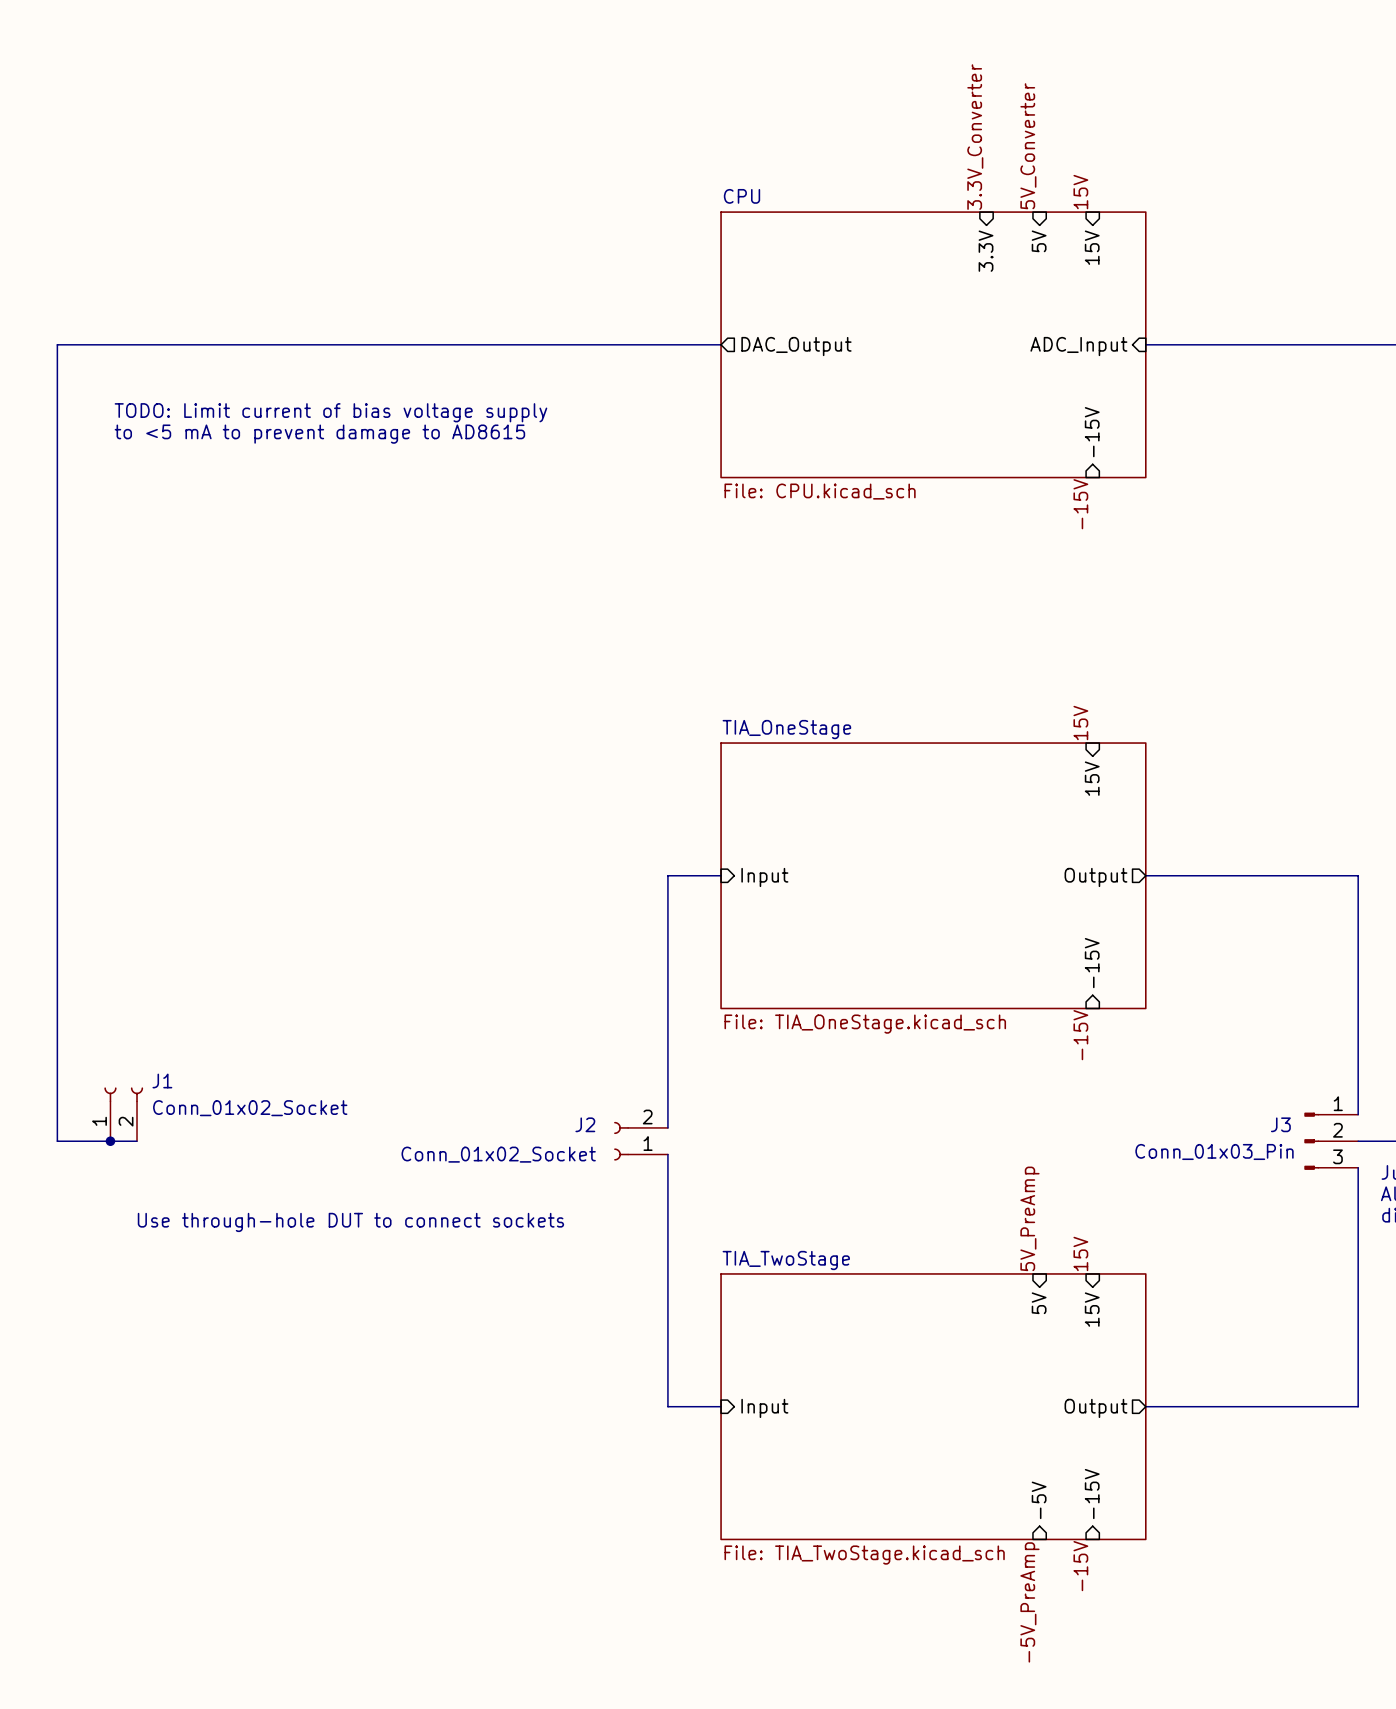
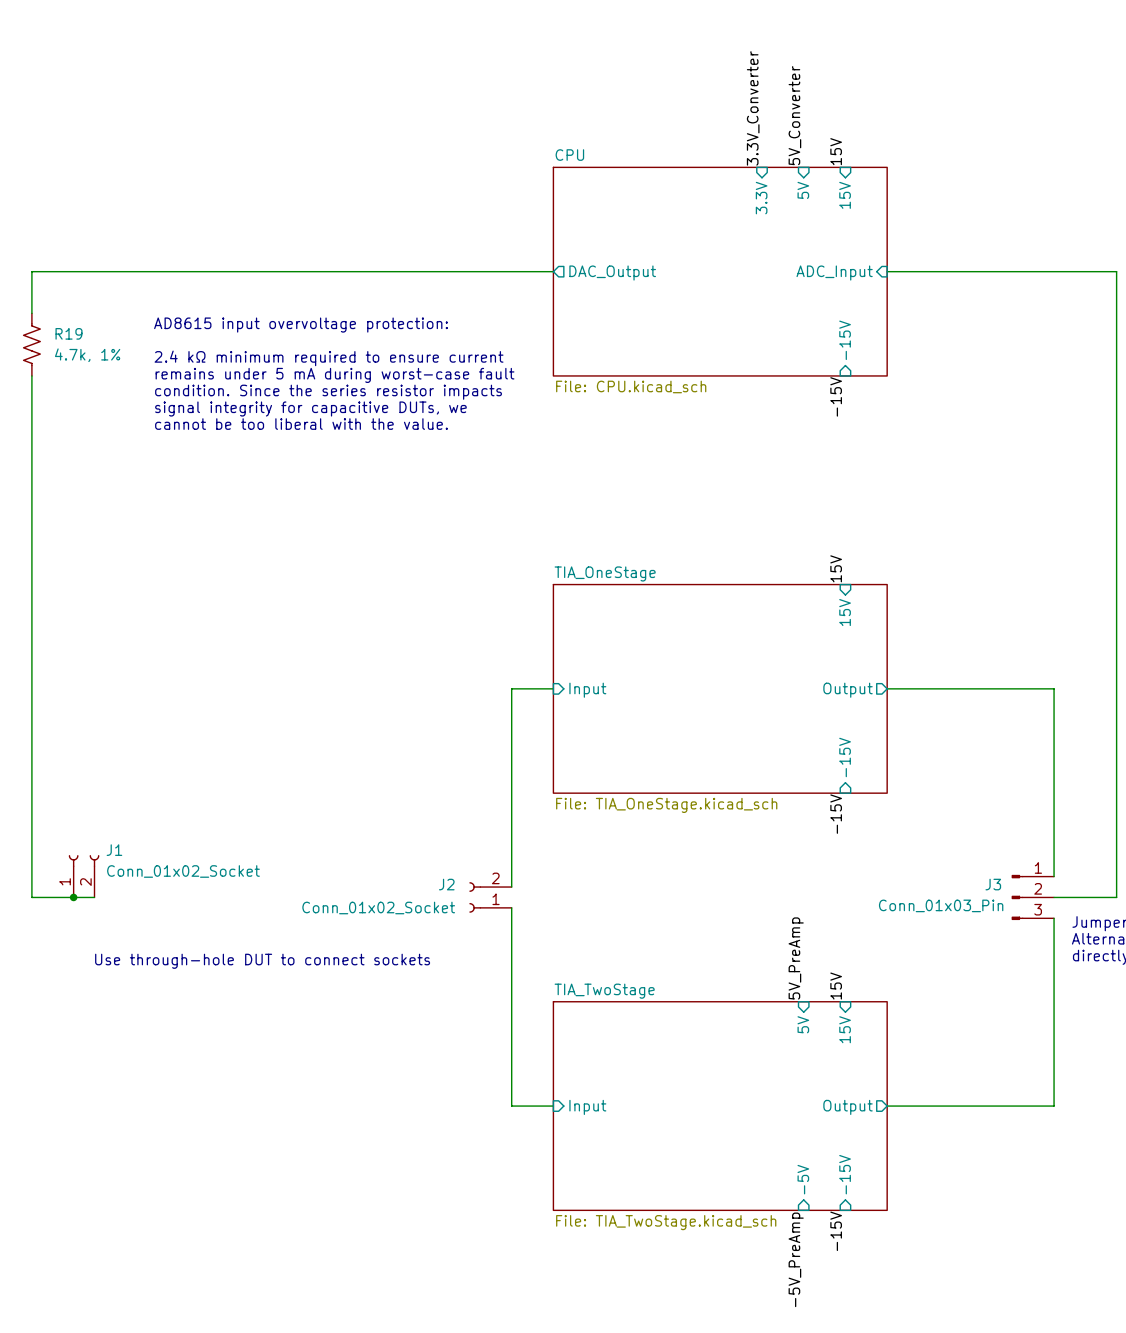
text: TODO: Limit current of bias voltage supply (330, 412) -> none
text: none -> AD8615 input overvoltage protection: (300, 325)
text: to <5 mA to prevent damage to AD8615 (319, 434) -> none
R19: none -> 4.7k, 1% (31, 344)
text: none -> 2.4 kΩ minimum required to ensure current (329, 358)
text: none -> remains under 5 mA during worst-case fault (335, 375)
text: none -> condition. Since the series resistor impacts (328, 392)
text: none -> signal integrity for capacitive DUTs, we (310, 409)
text: none -> cannot be too liberal with the value. (301, 424)

